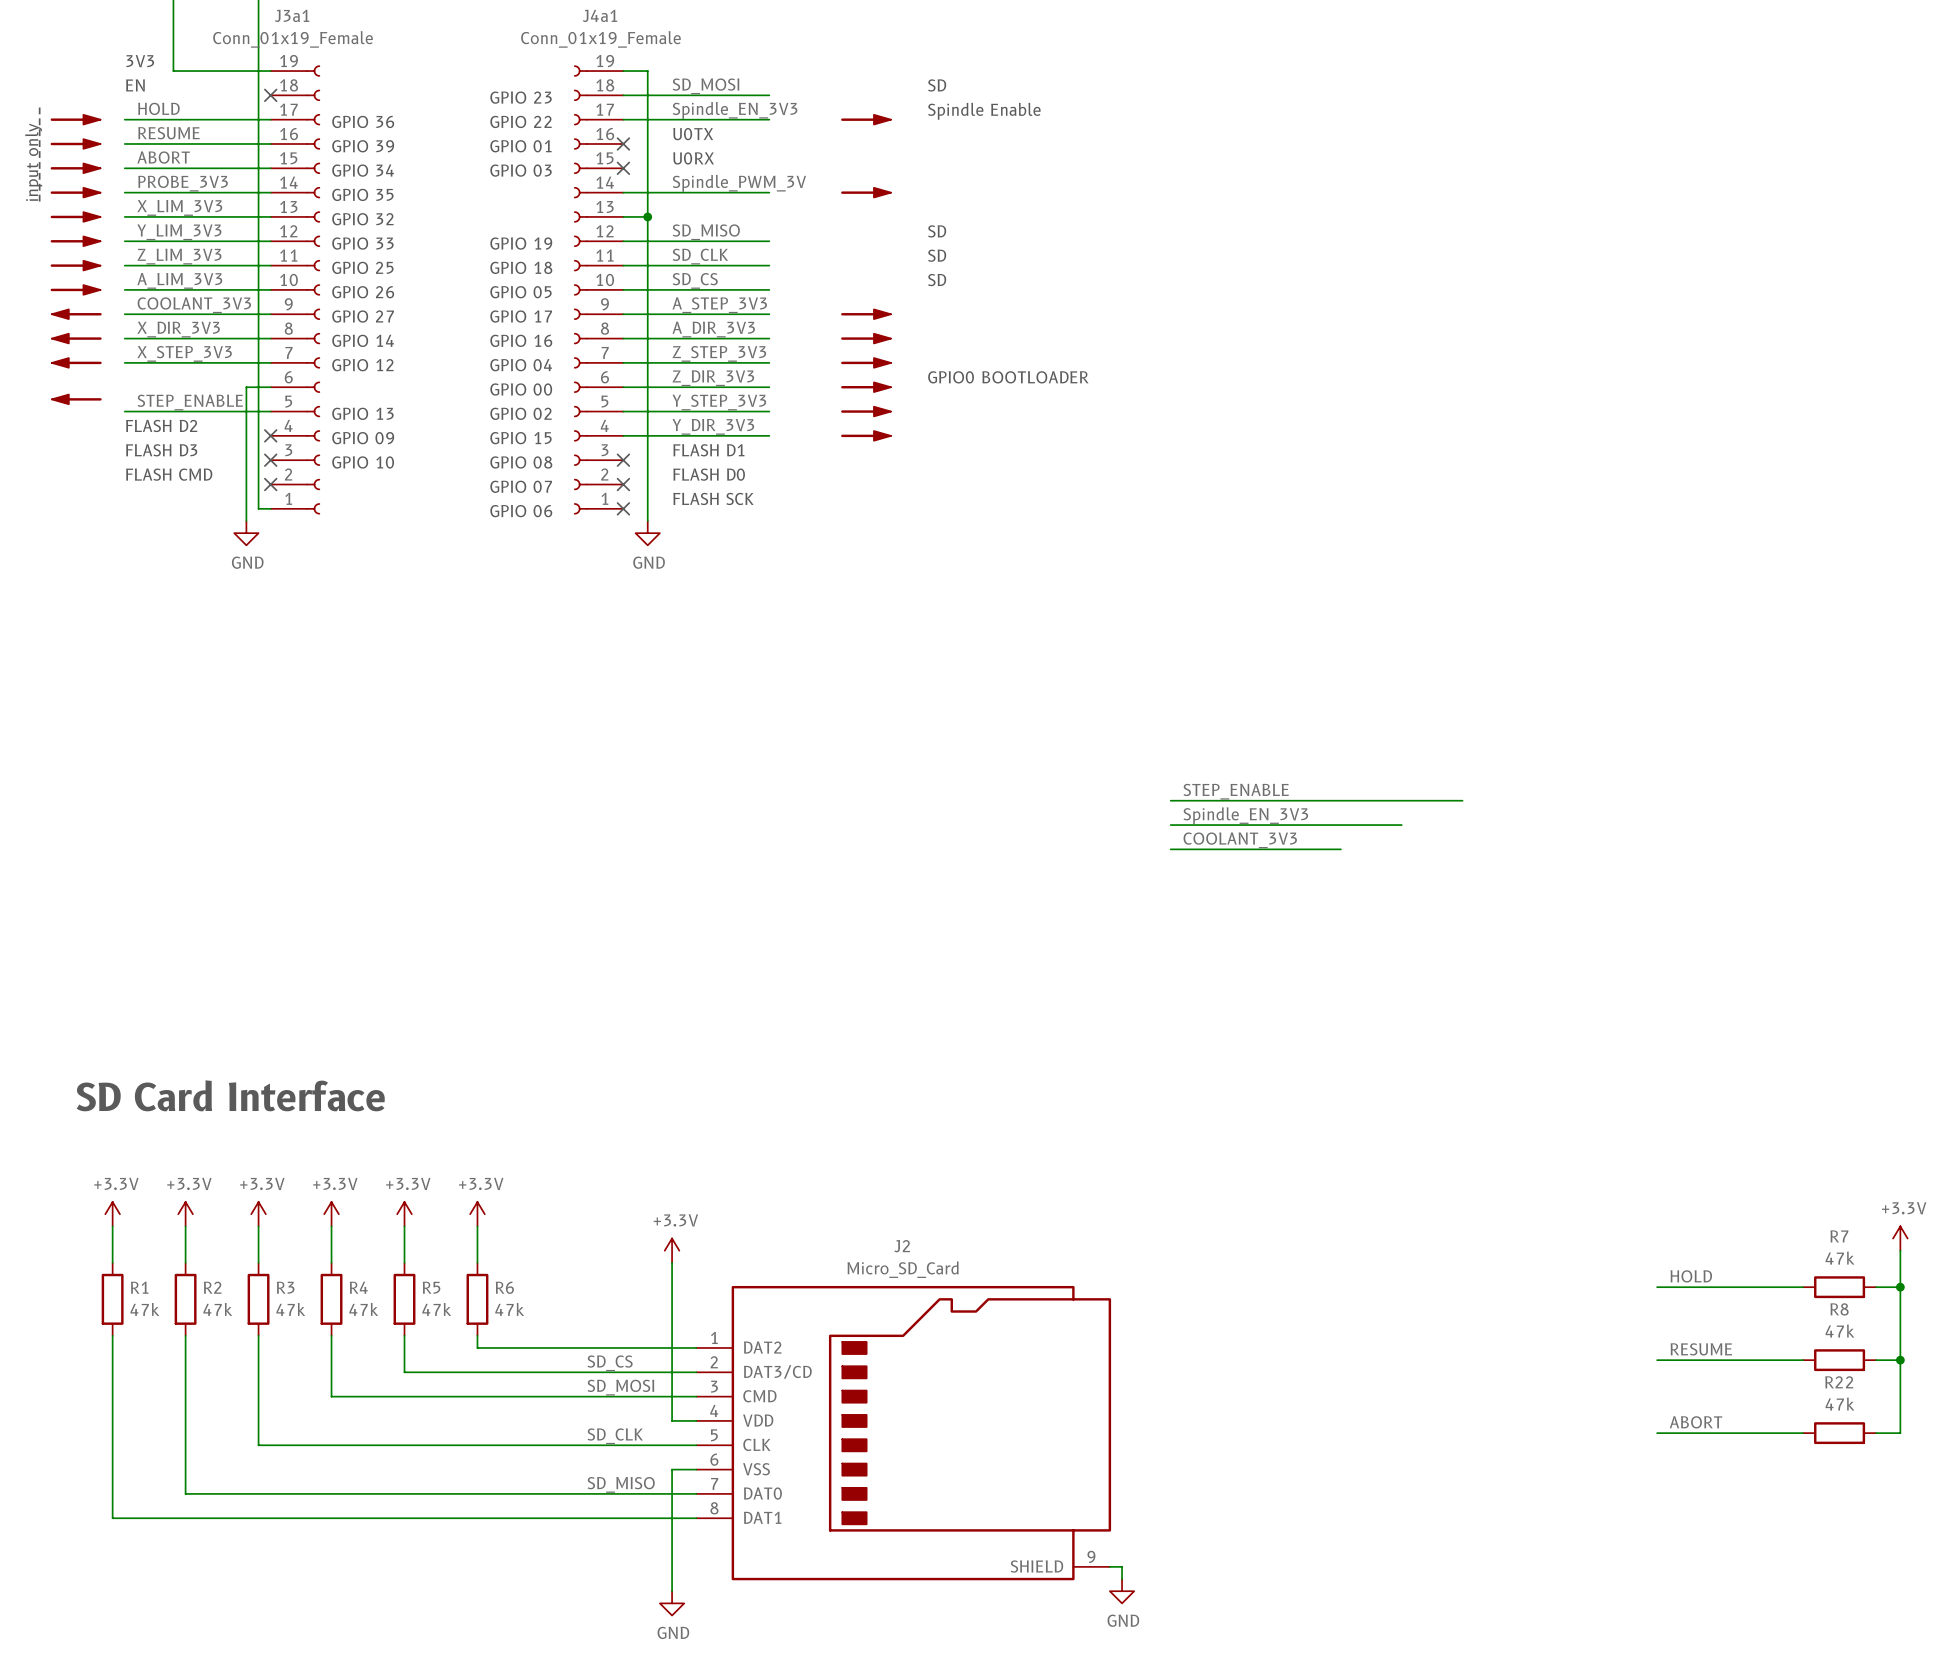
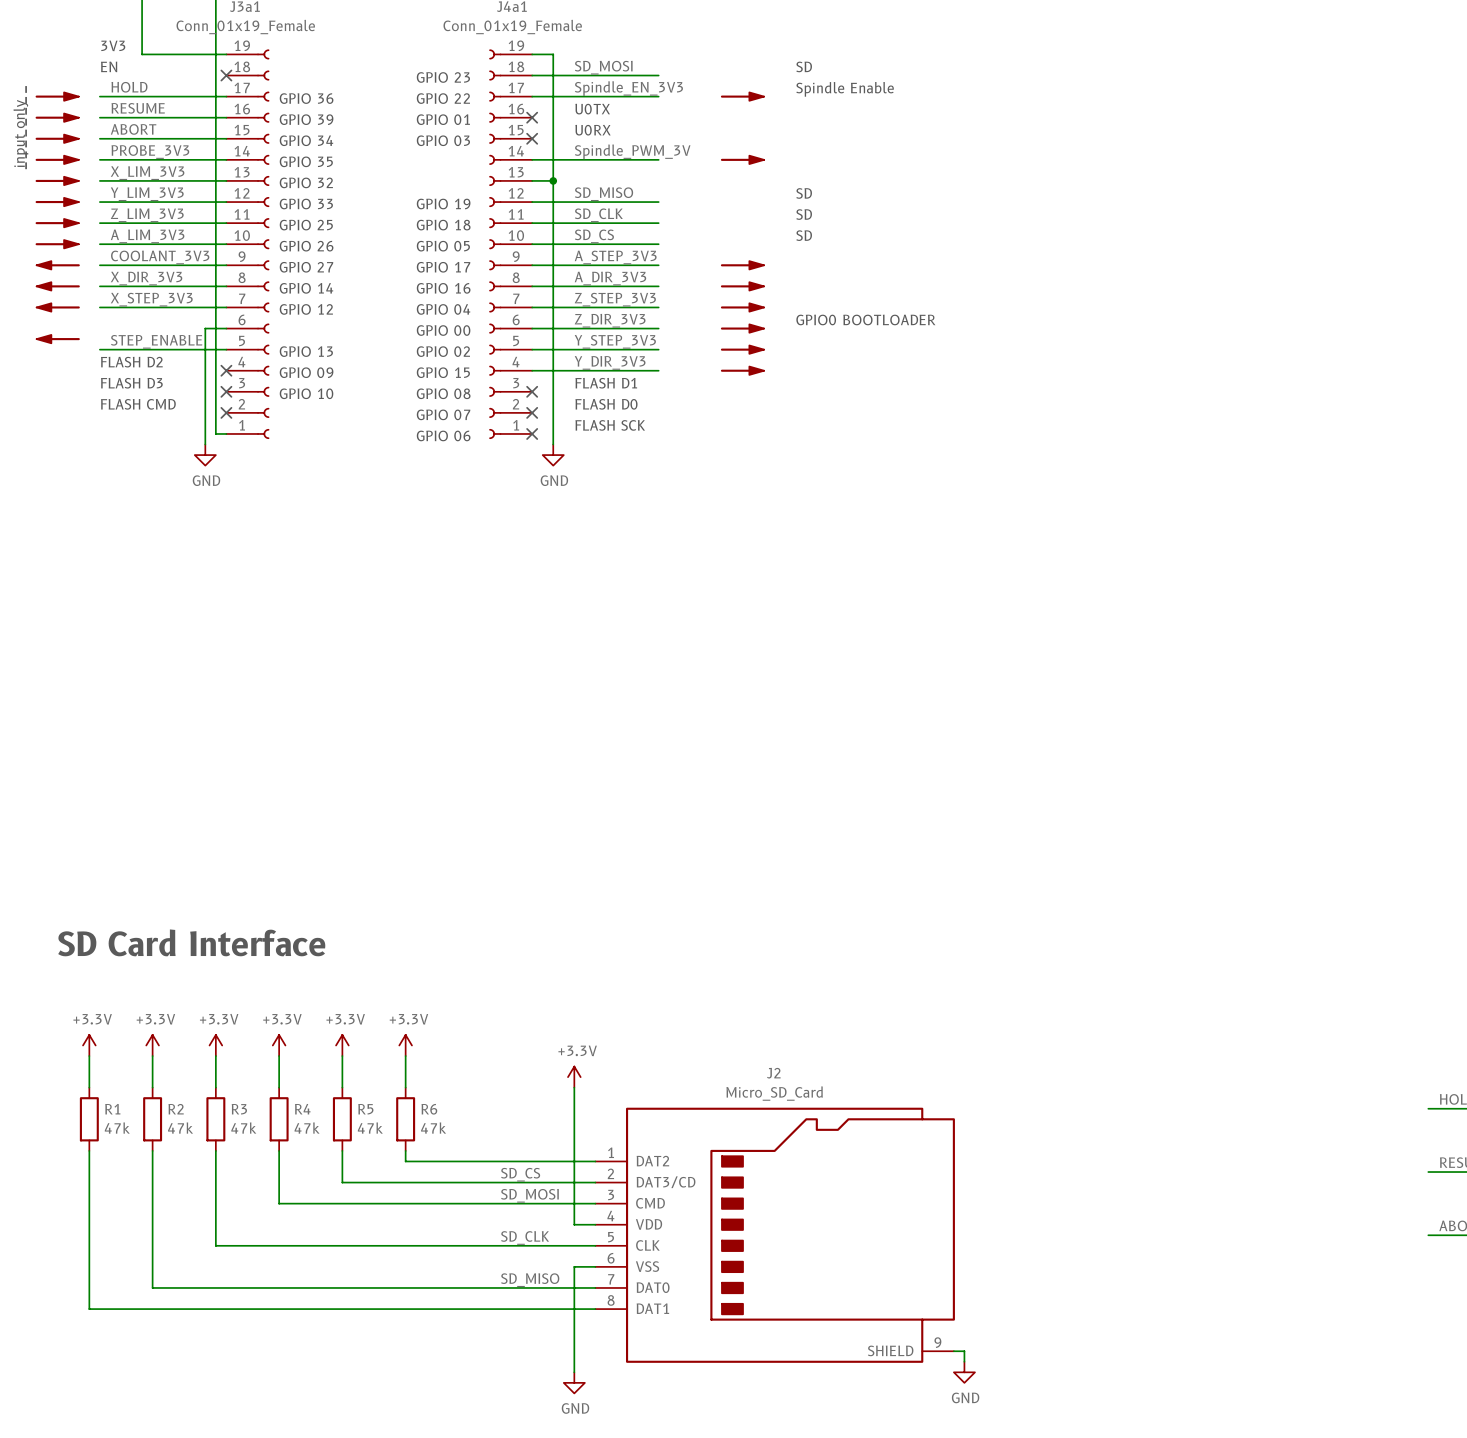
label: STEP_ENABLE (1236, 791) -> none
wire: (1170, 800) (1462, 800) -> none
label: Spindle_EN_3V3 (1245, 815) -> none
wire: (1170, 825) (1401, 825) -> none
label: COOLANT_3V3 (1240, 840) -> none
wire: (1170, 849) (1340, 849) -> none

